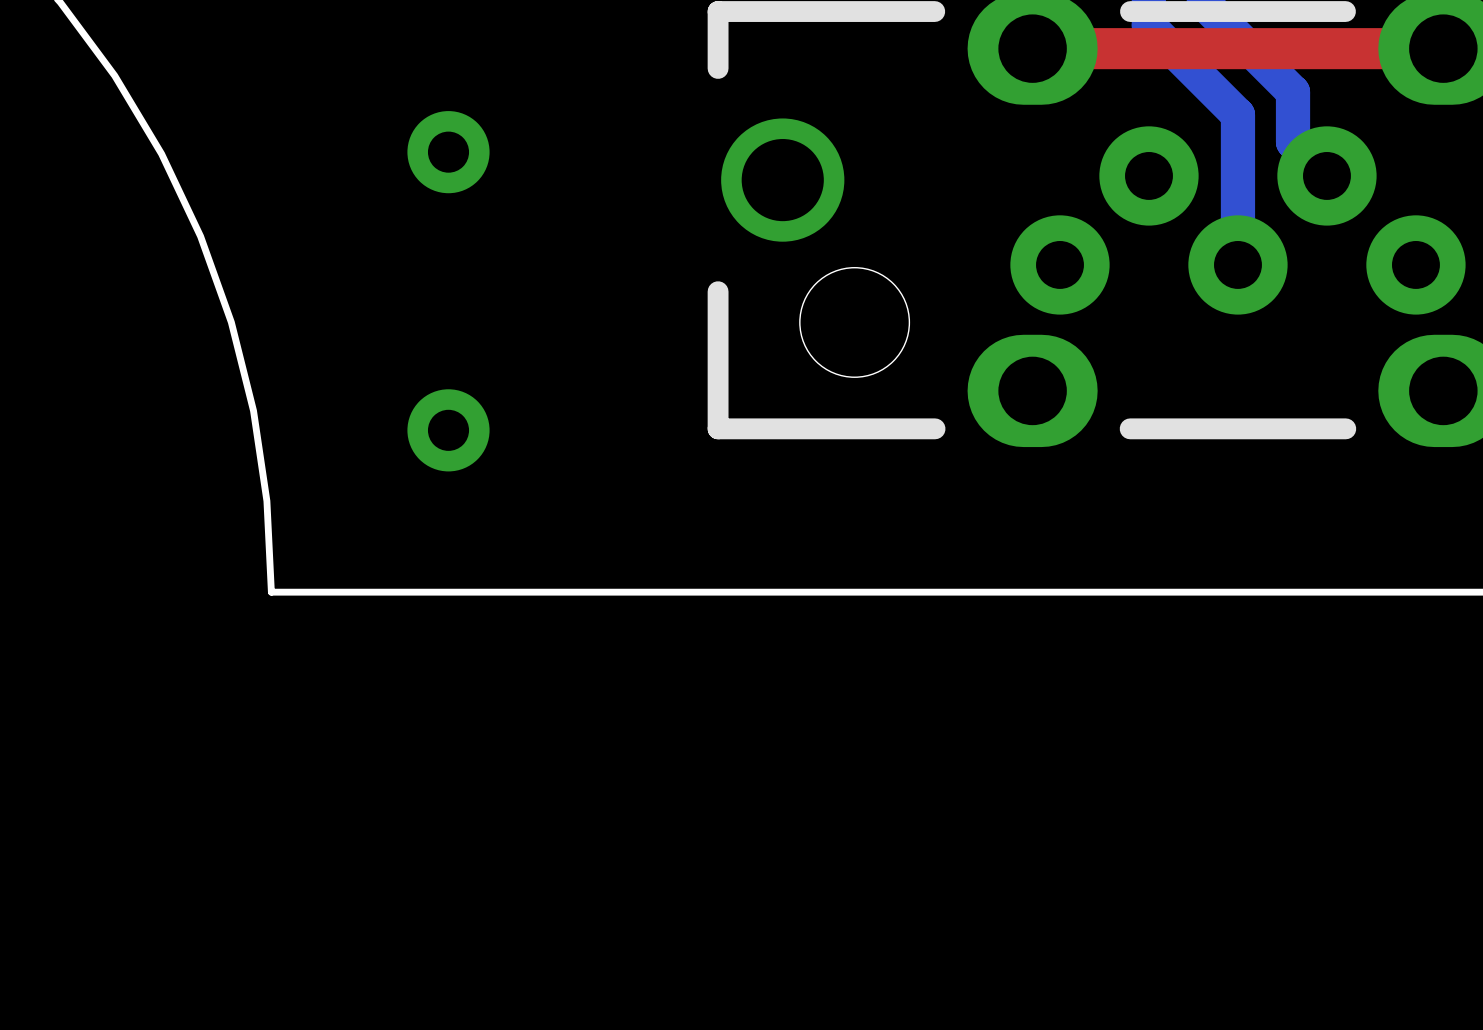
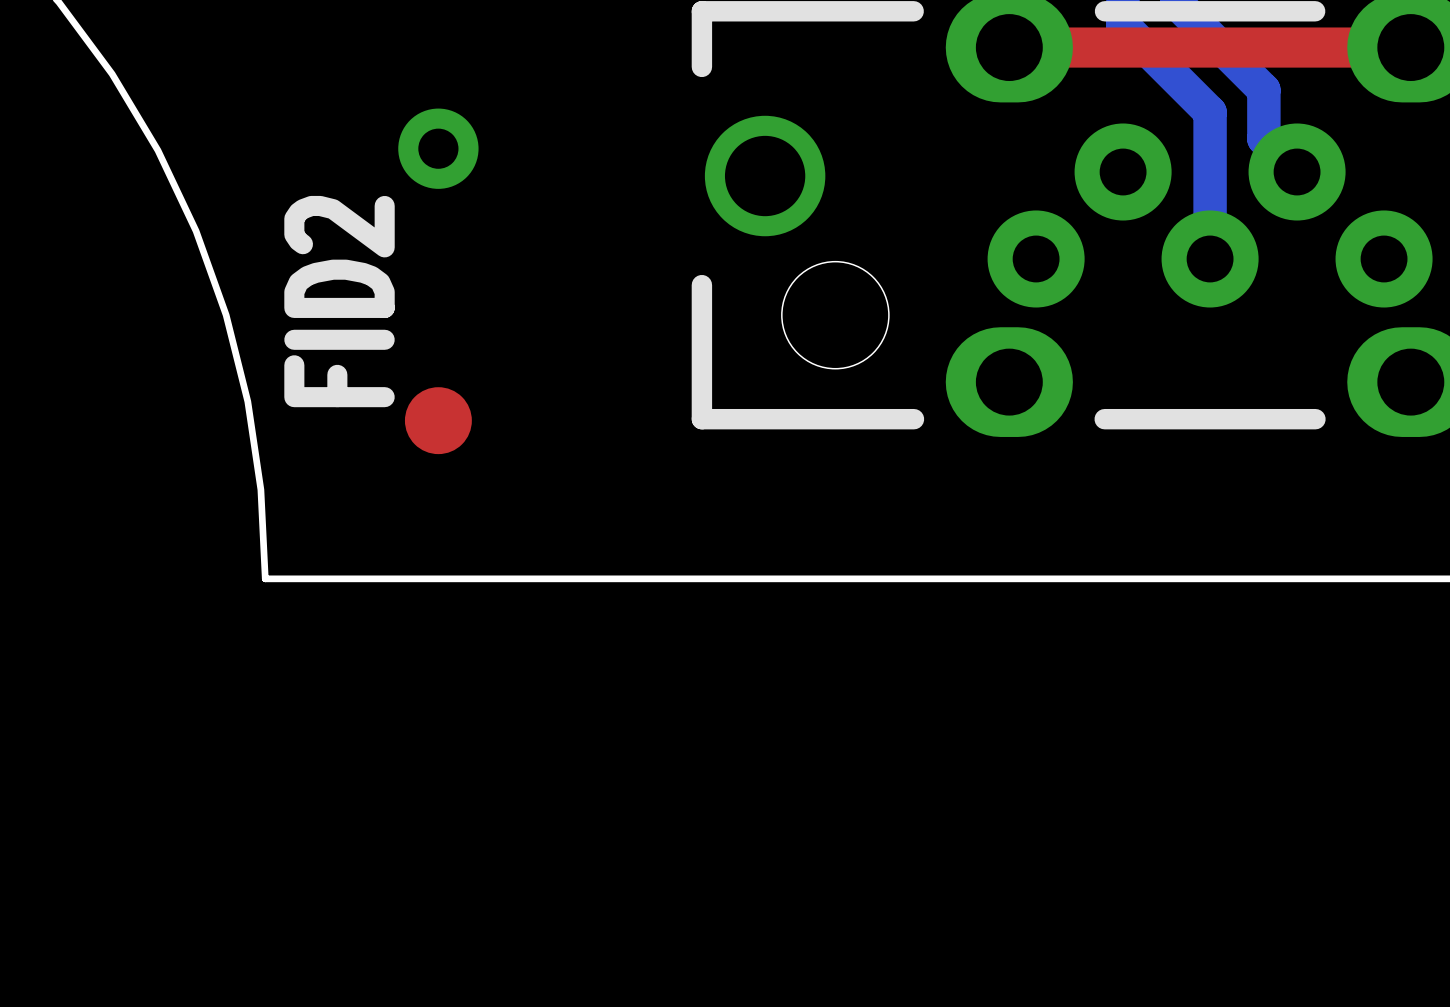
FID2: none -> (438, 420)
via: (448, 430) -> none

